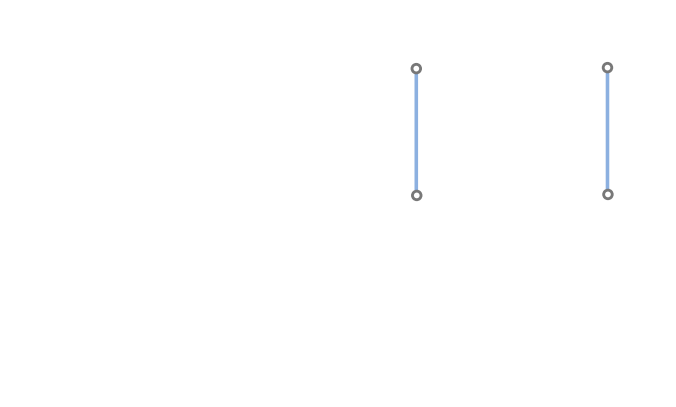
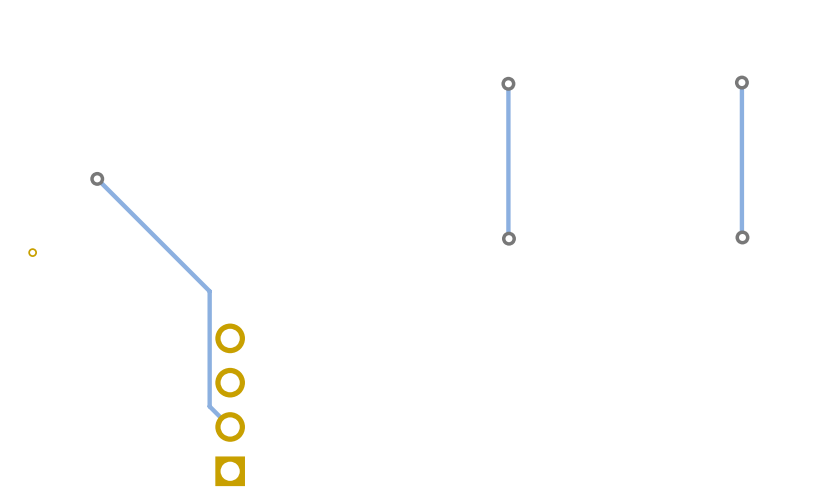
track: none -> (97, 178) (209, 291) (209, 406) (230, 426)
via: none -> (97, 178)
part: none -> (32, 252)
part: none -> (230, 404)

